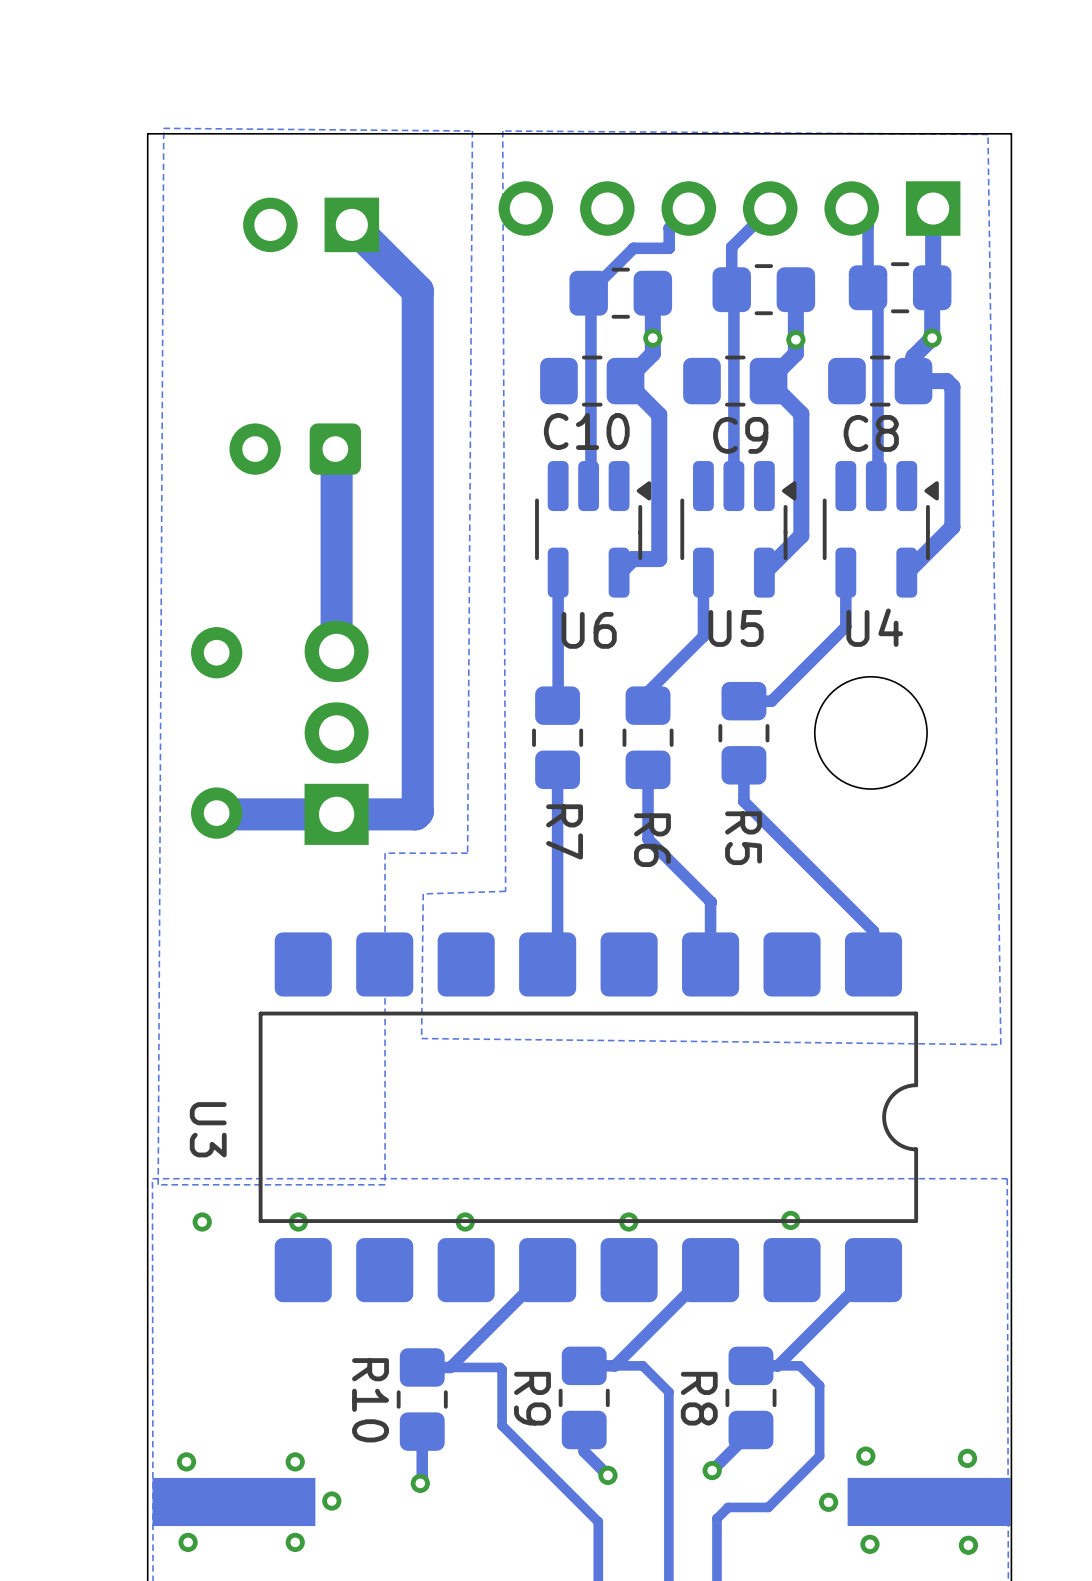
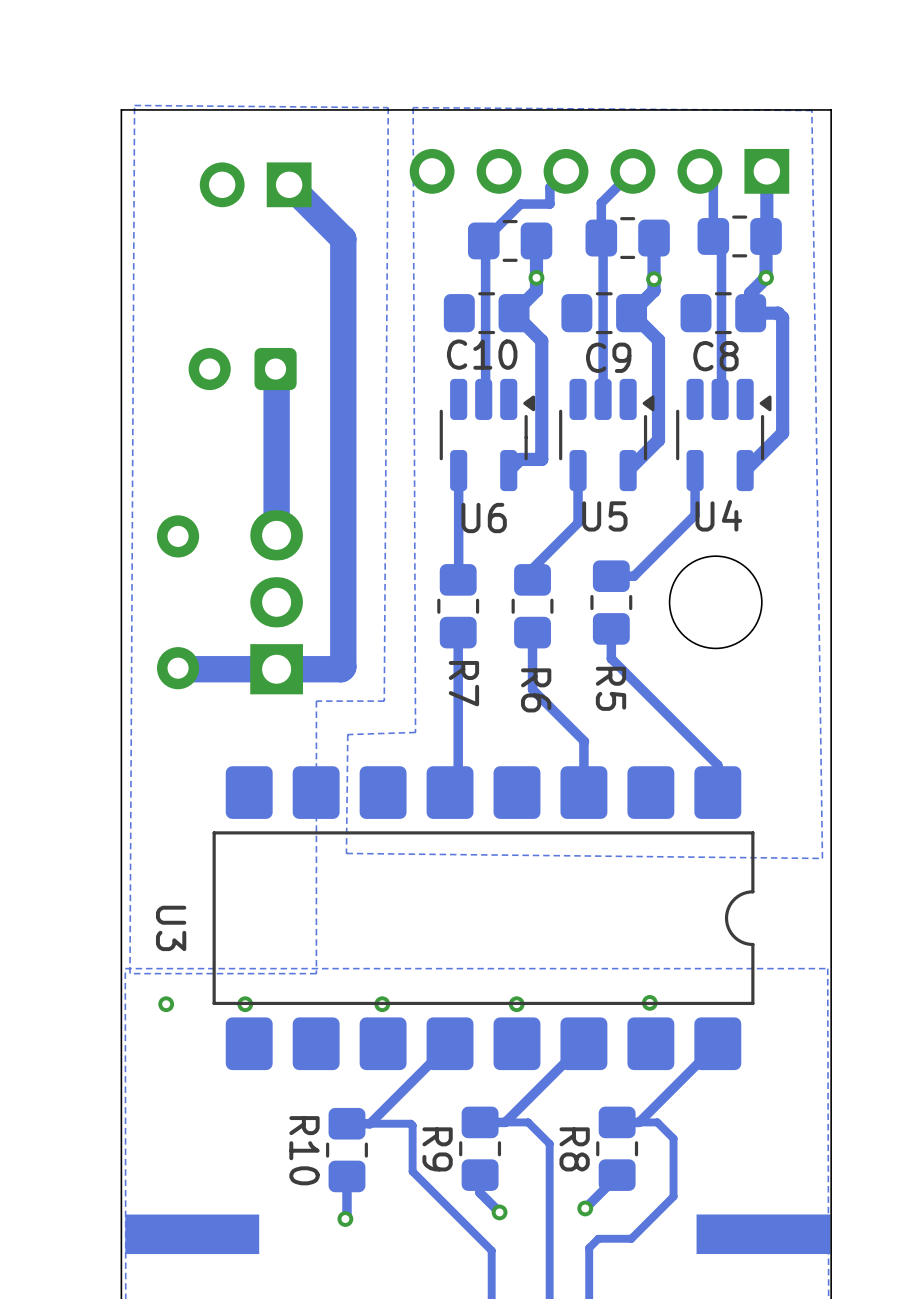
via: (865, 1456) -> none
via: (967, 1458) -> none
via: (186, 1461) -> none
via: (295, 1461) -> none
via: (331, 1501) -> none
via: (828, 1502) -> none
via: (188, 1542) -> none
via: (295, 1542) -> none
via: (869, 1544) -> none
via: (968, 1545) -> none

